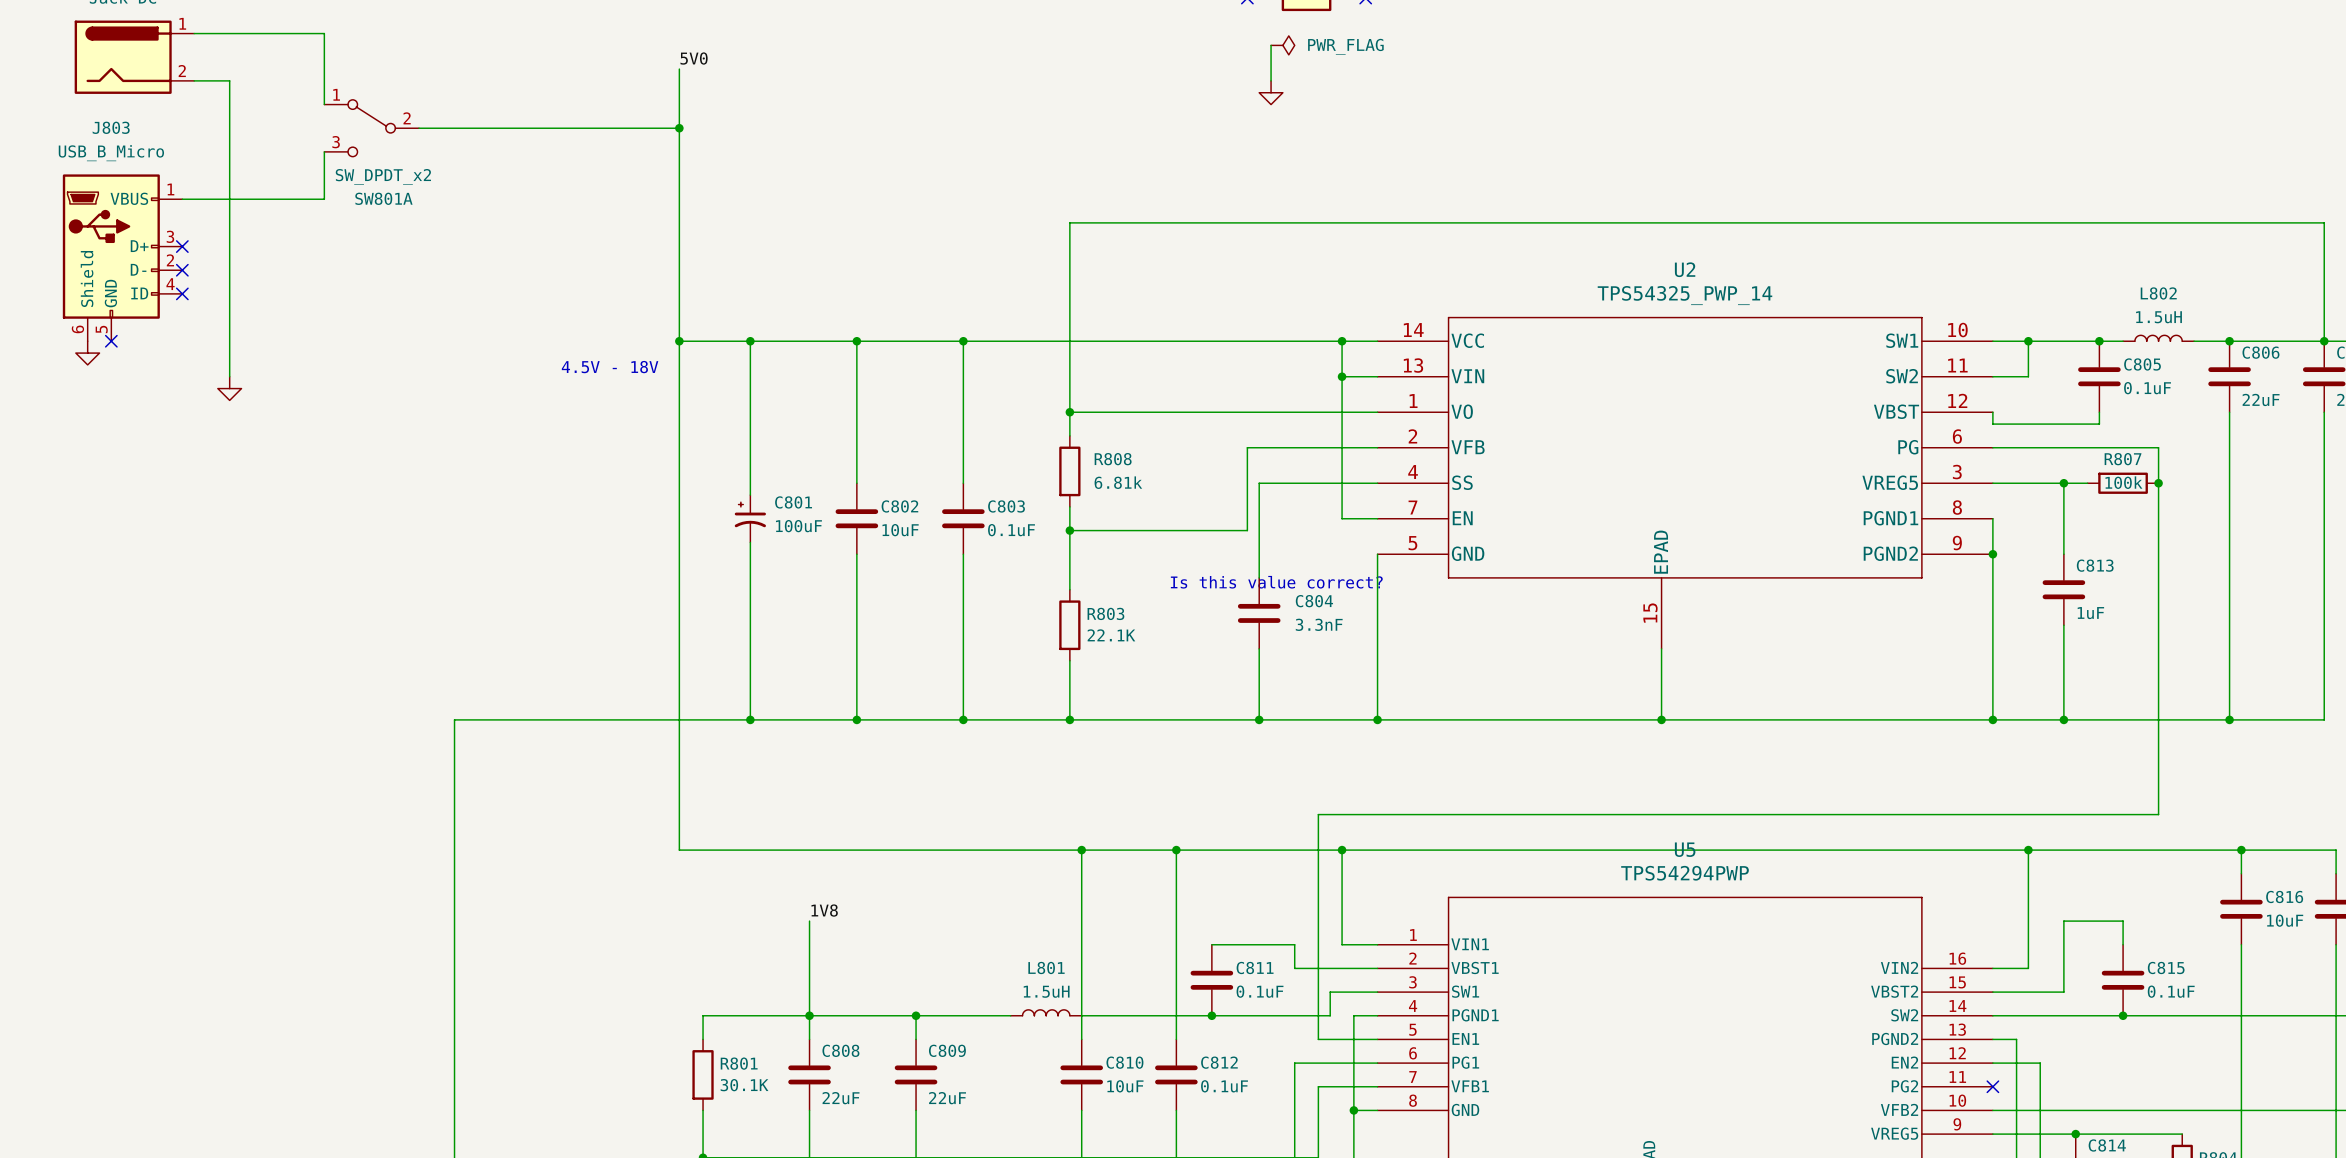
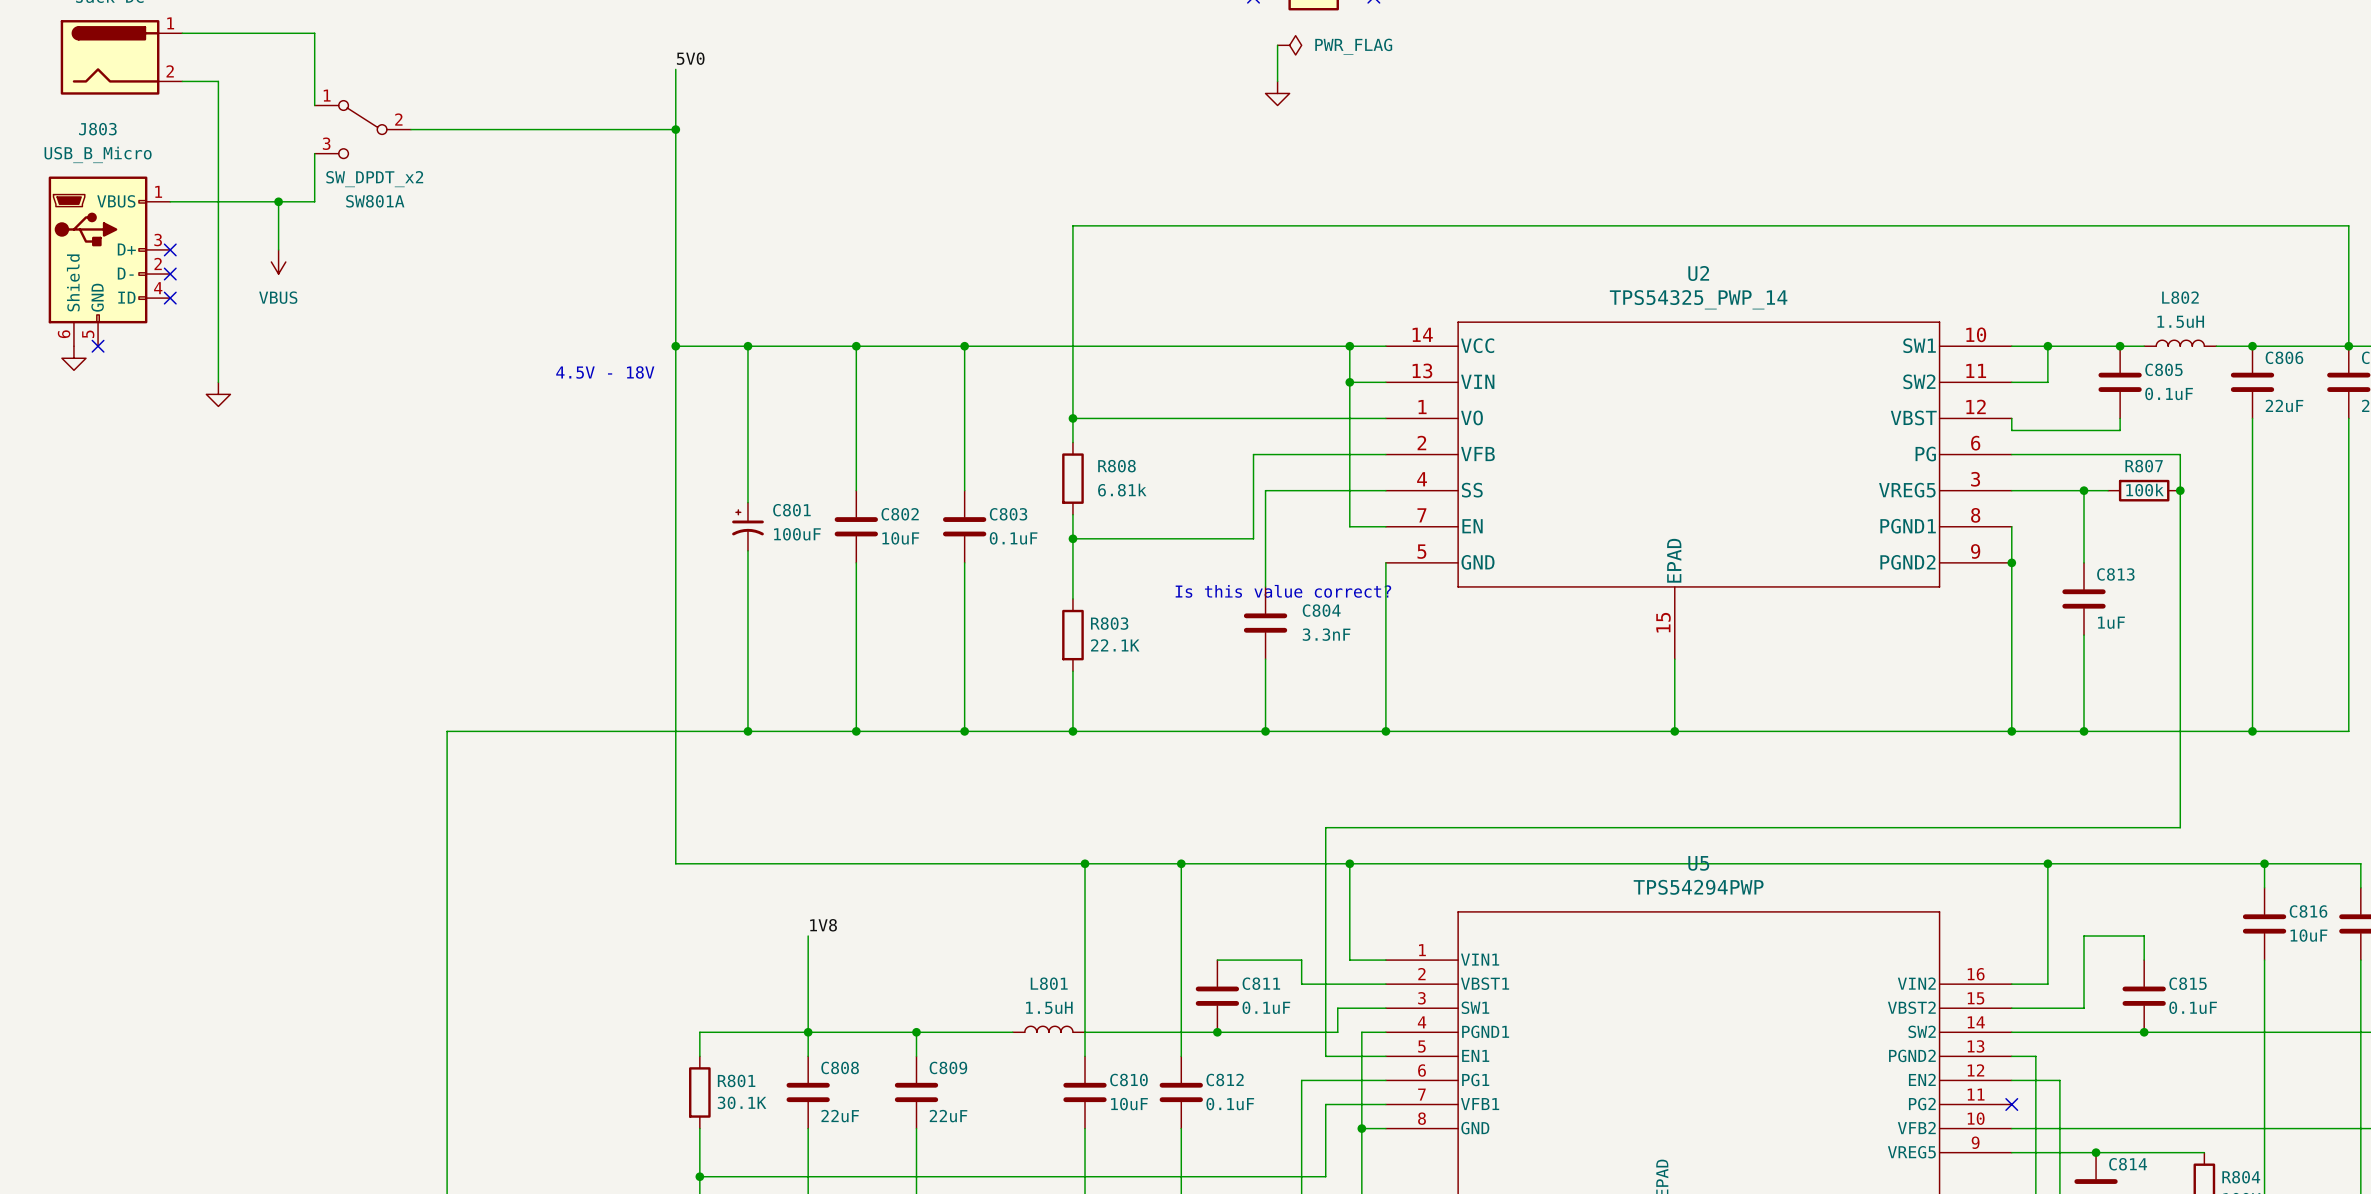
wire: none -> (278, 201) (278, 249)
junction: none -> (278, 201)
power symbol: none -> VBUS (278, 261)

